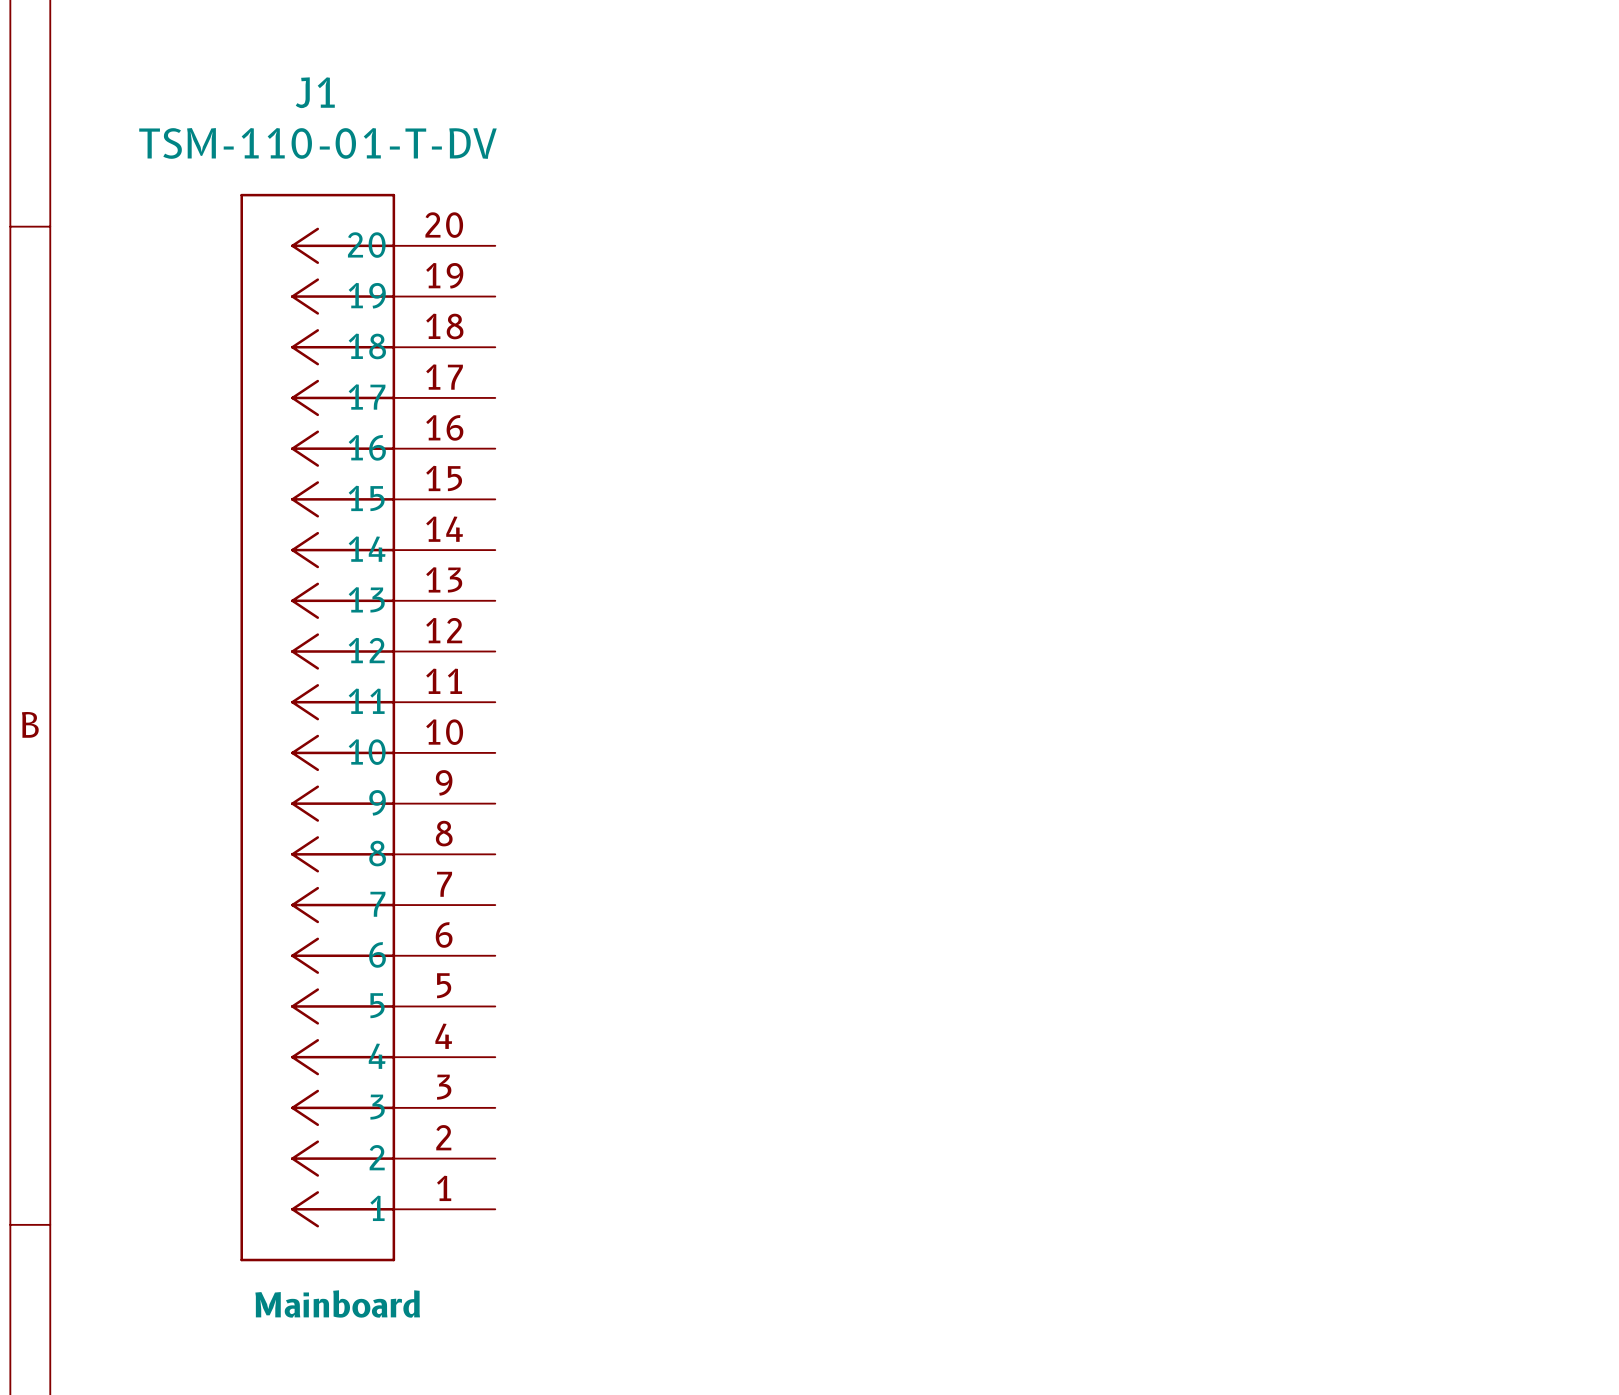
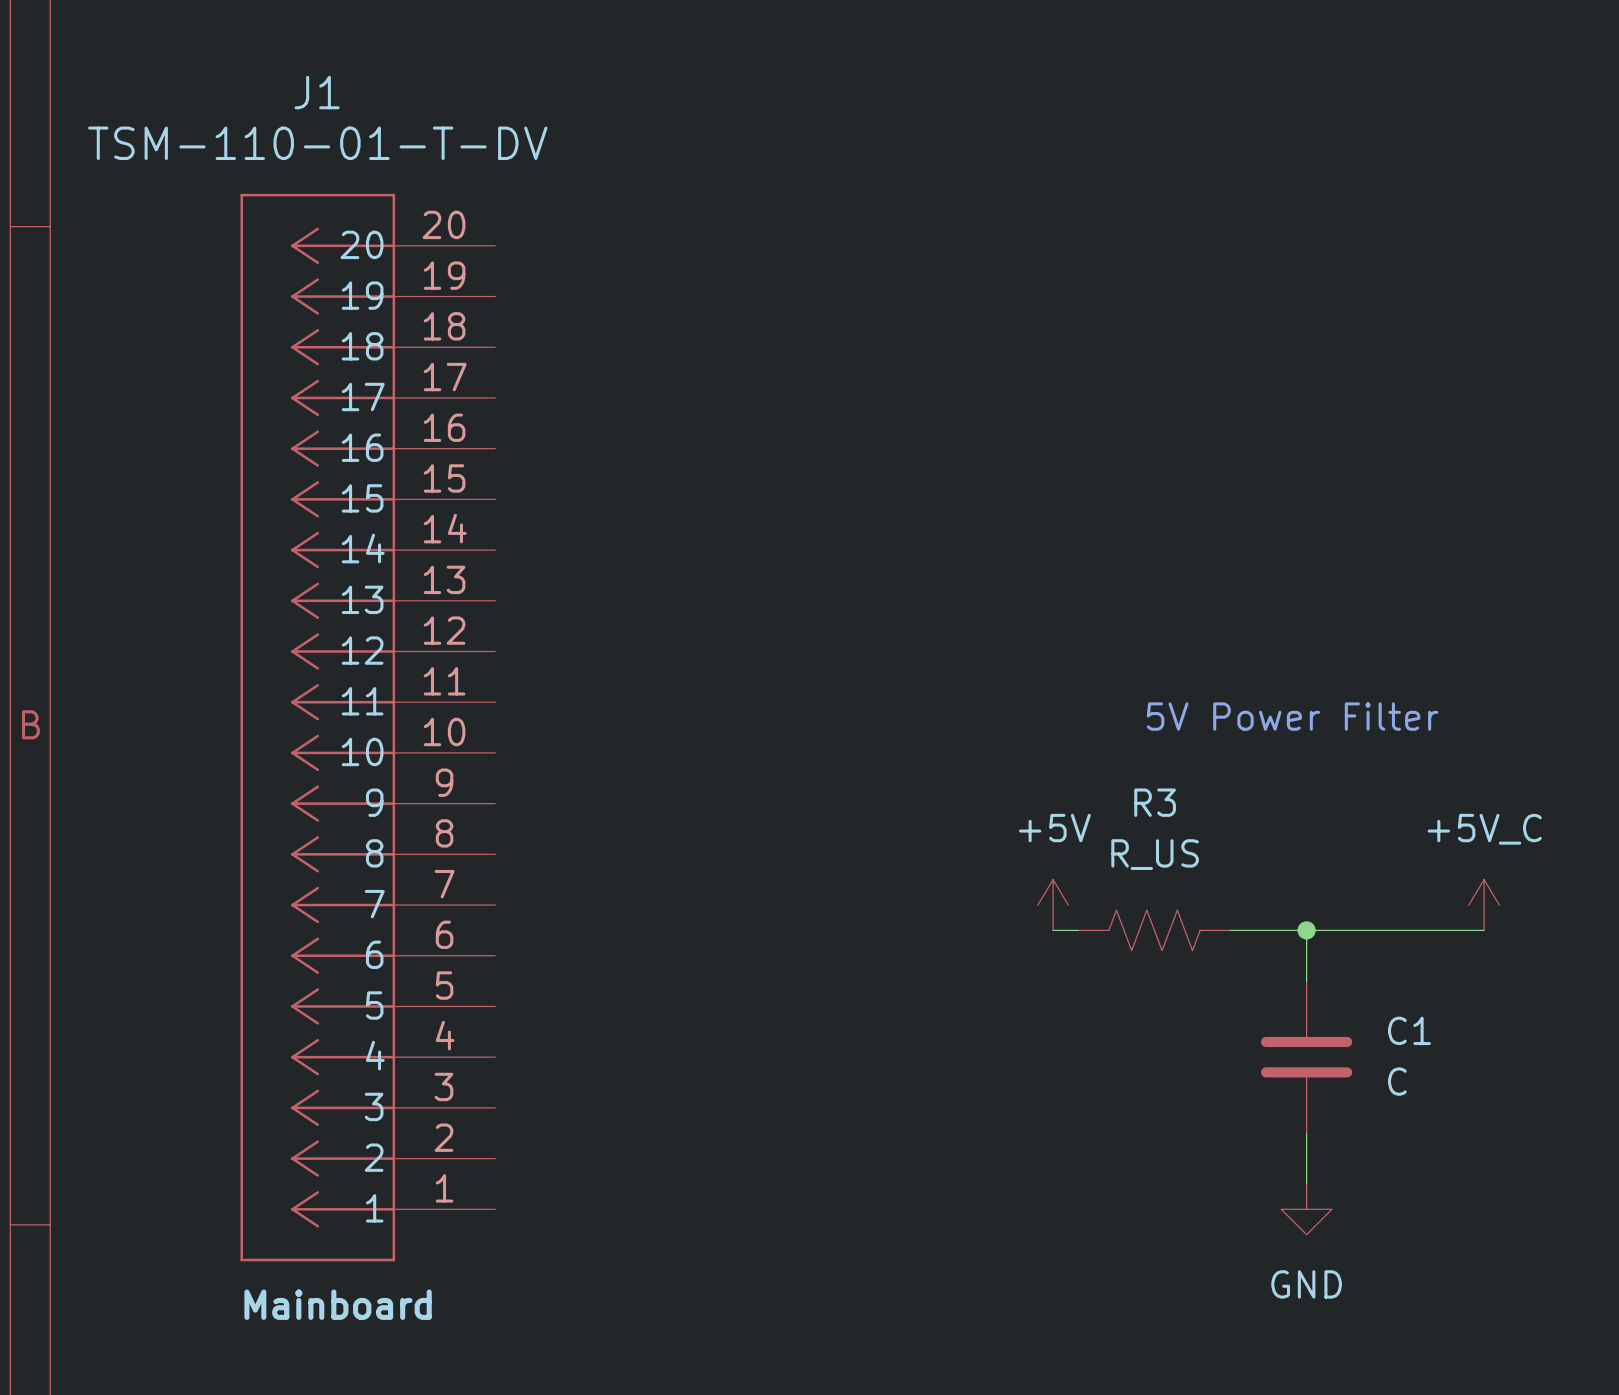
text: none -> 5V Power Filter (1292, 716)
power symbol: none -> +5V (1053, 905)
power symbol: none -> +5V_C (1484, 905)
wire: none -> (1053, 930) (1078, 930)
R3: none -> R_US (1154, 930)
wire: none -> (1230, 930) (1484, 930)
wire: none -> (1306, 930) (1306, 981)
junction: none -> (1306, 930)
C1: none -> C (1306, 1057)
wire: none -> (1306, 1133) (1306, 1183)
power symbol: none -> GND (1306, 1209)

